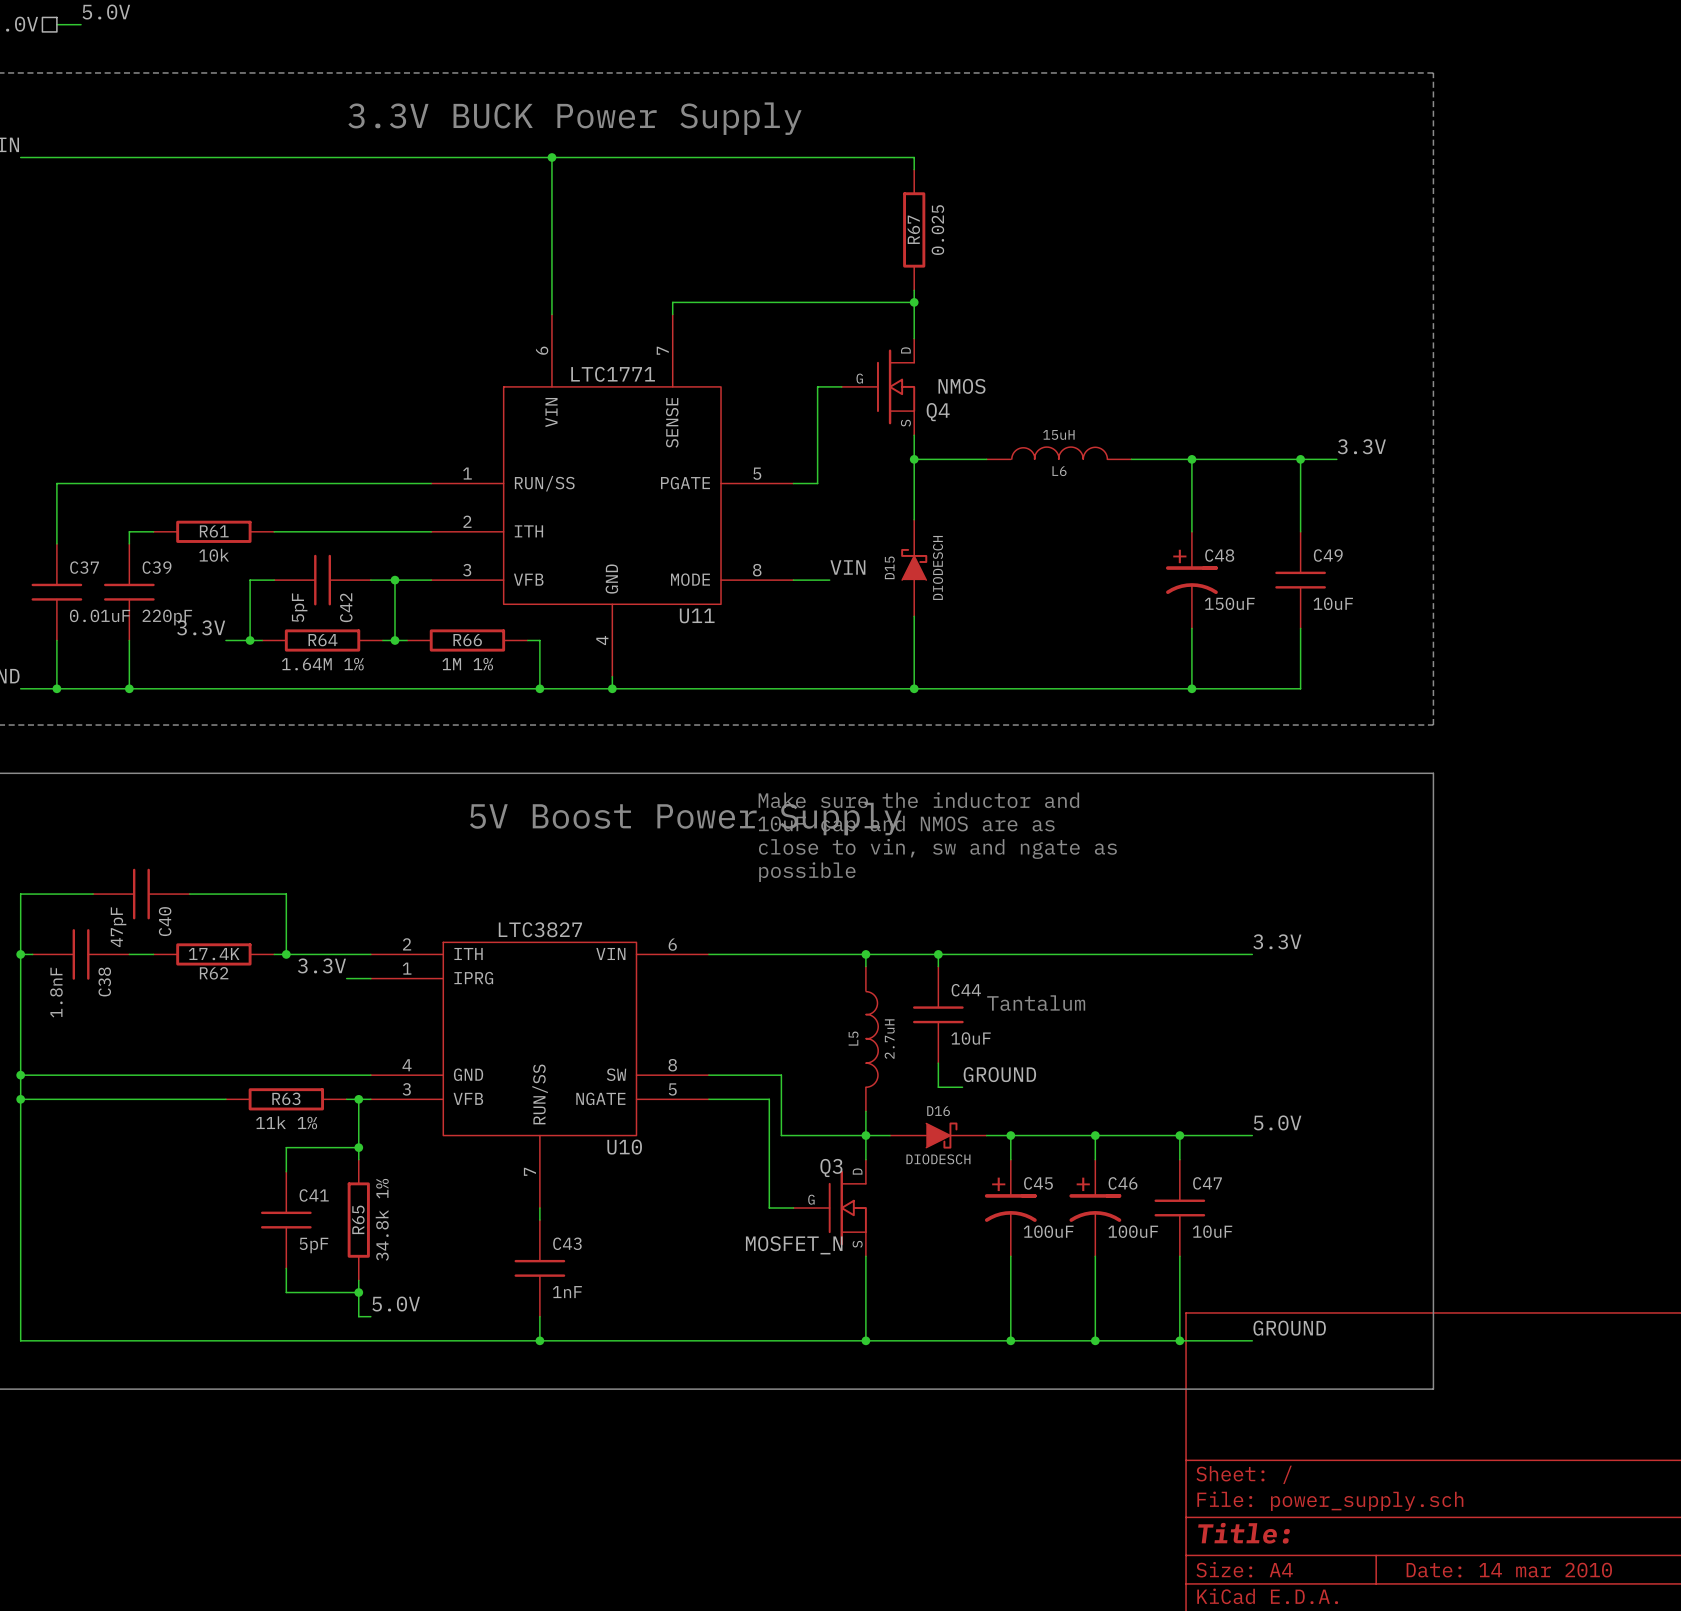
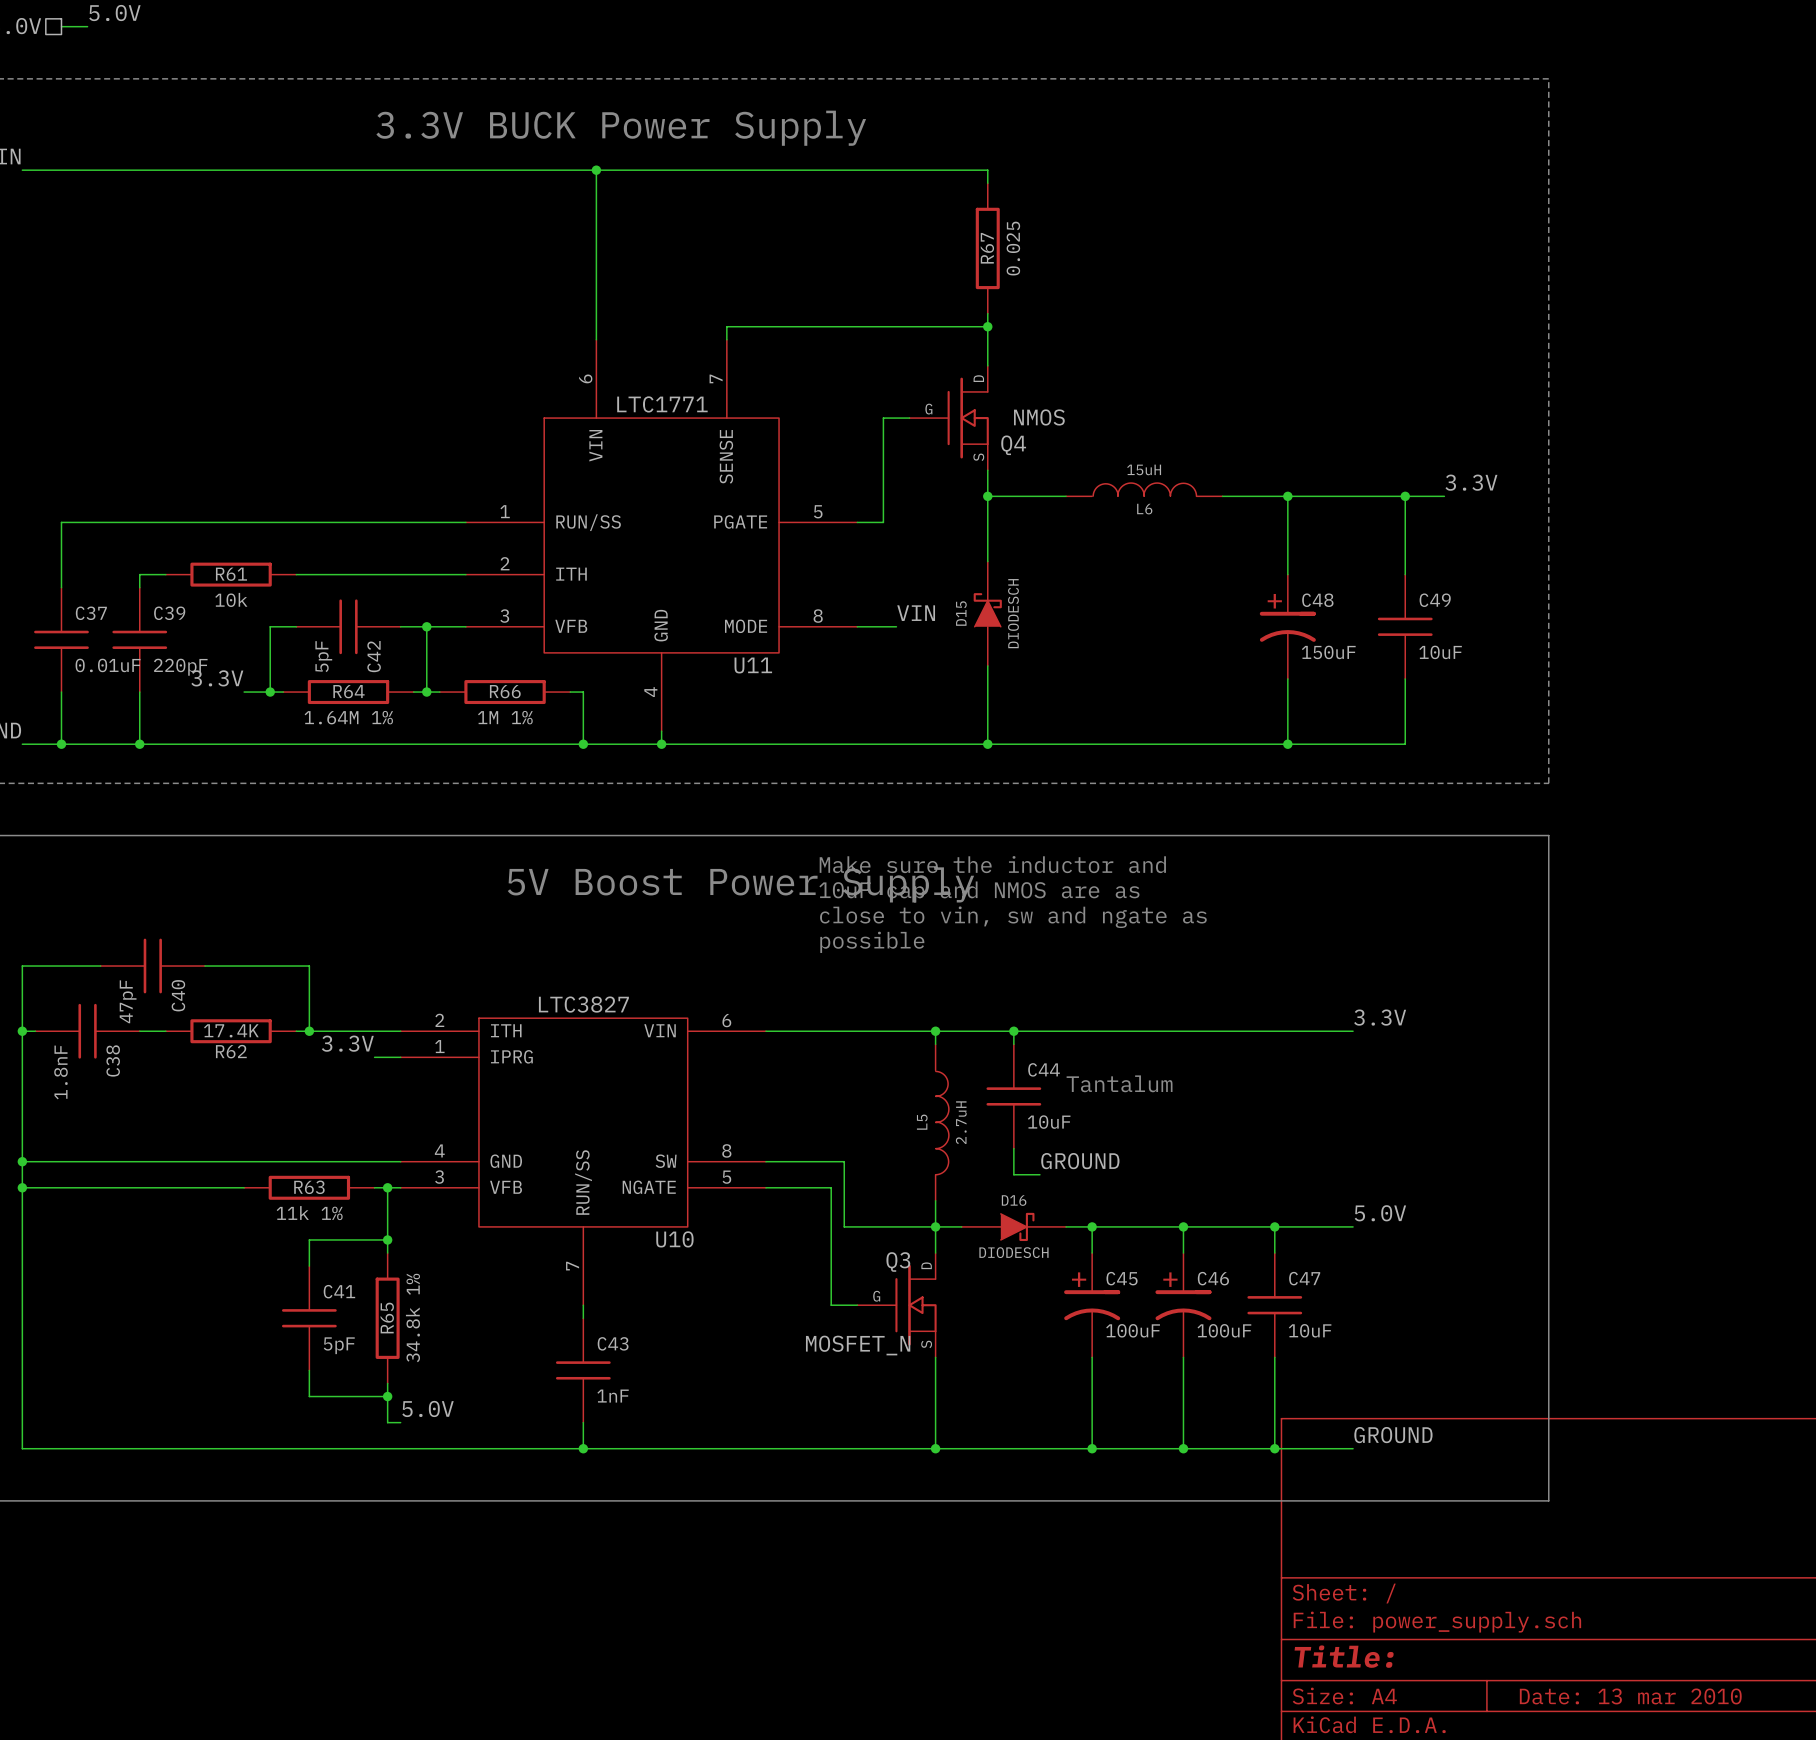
title block: Date: 14 mar 2010 (1509, 1570) -> Date: 13 mar 2010 (1630, 1696)

